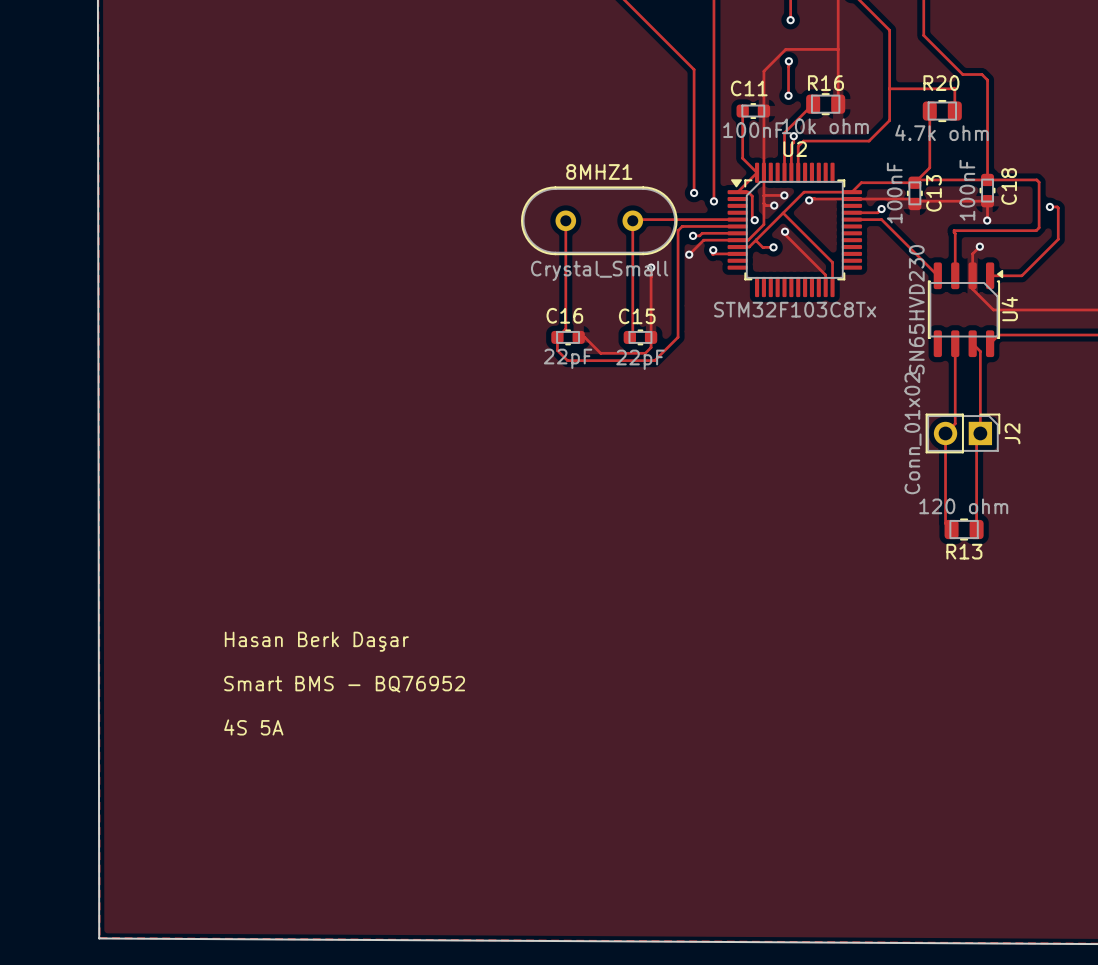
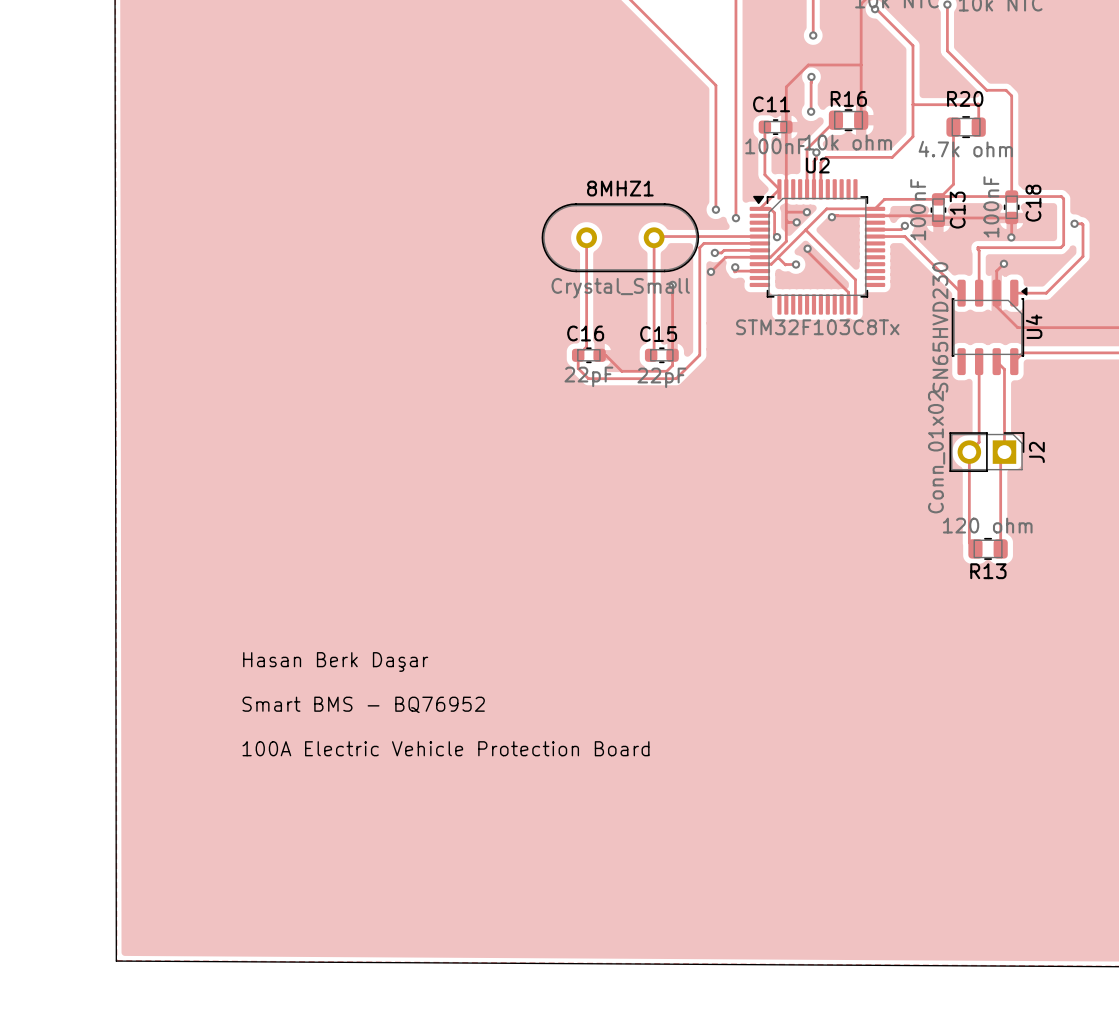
text: 4S 5A (253, 727) -> 100A Electric Vehicle Protection Board (445, 748)

